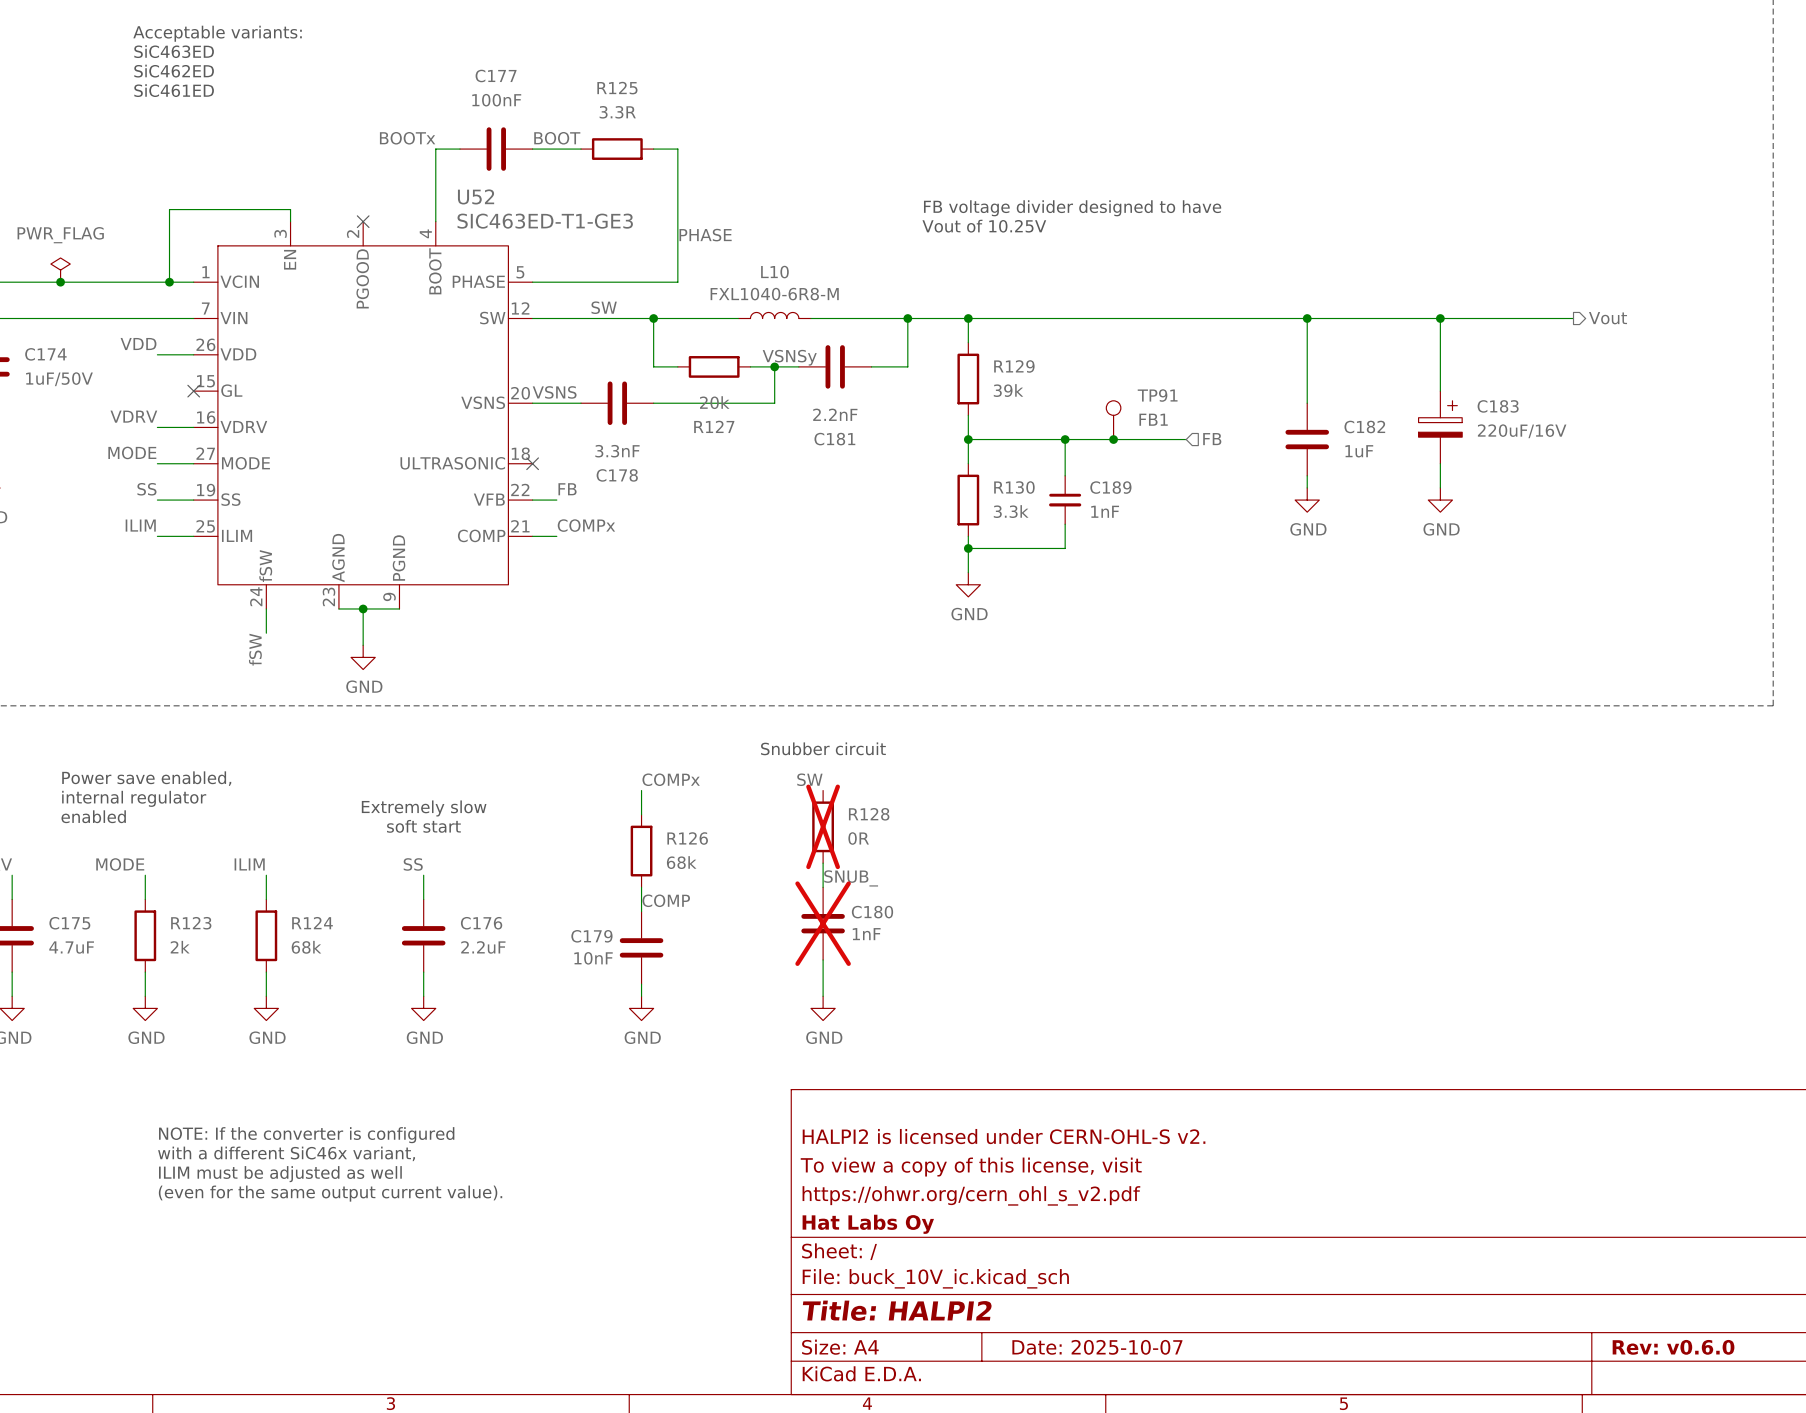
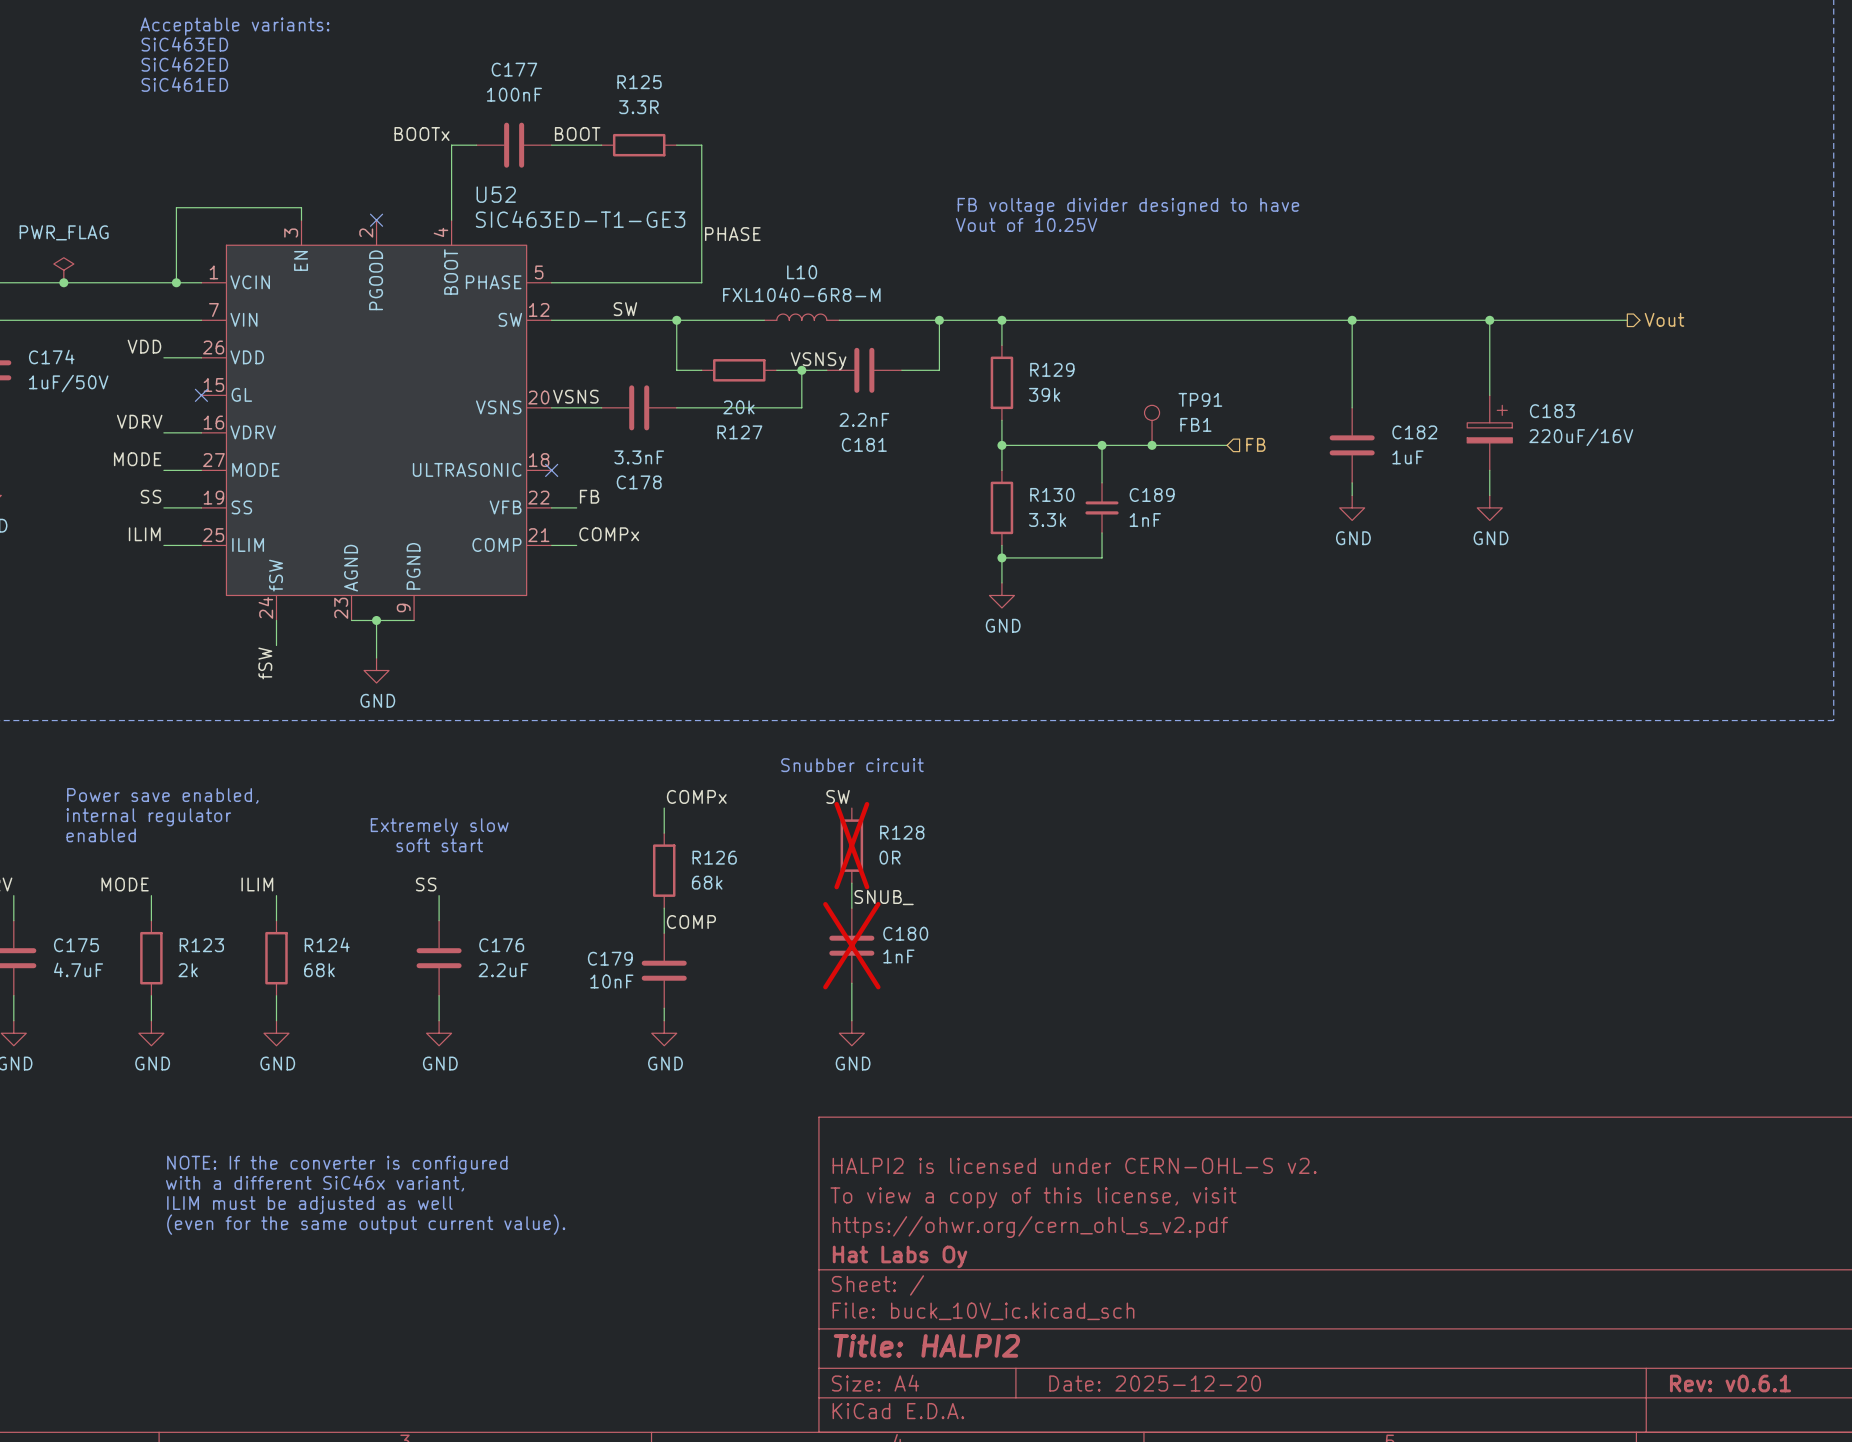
title block: Date: 2025-10-07 (1097, 1347) -> Date: 2025-12-20 (1155, 1383)
title block: Rev: v0.6.0 (1673, 1347) -> Rev: v0.6.1 (1730, 1383)

